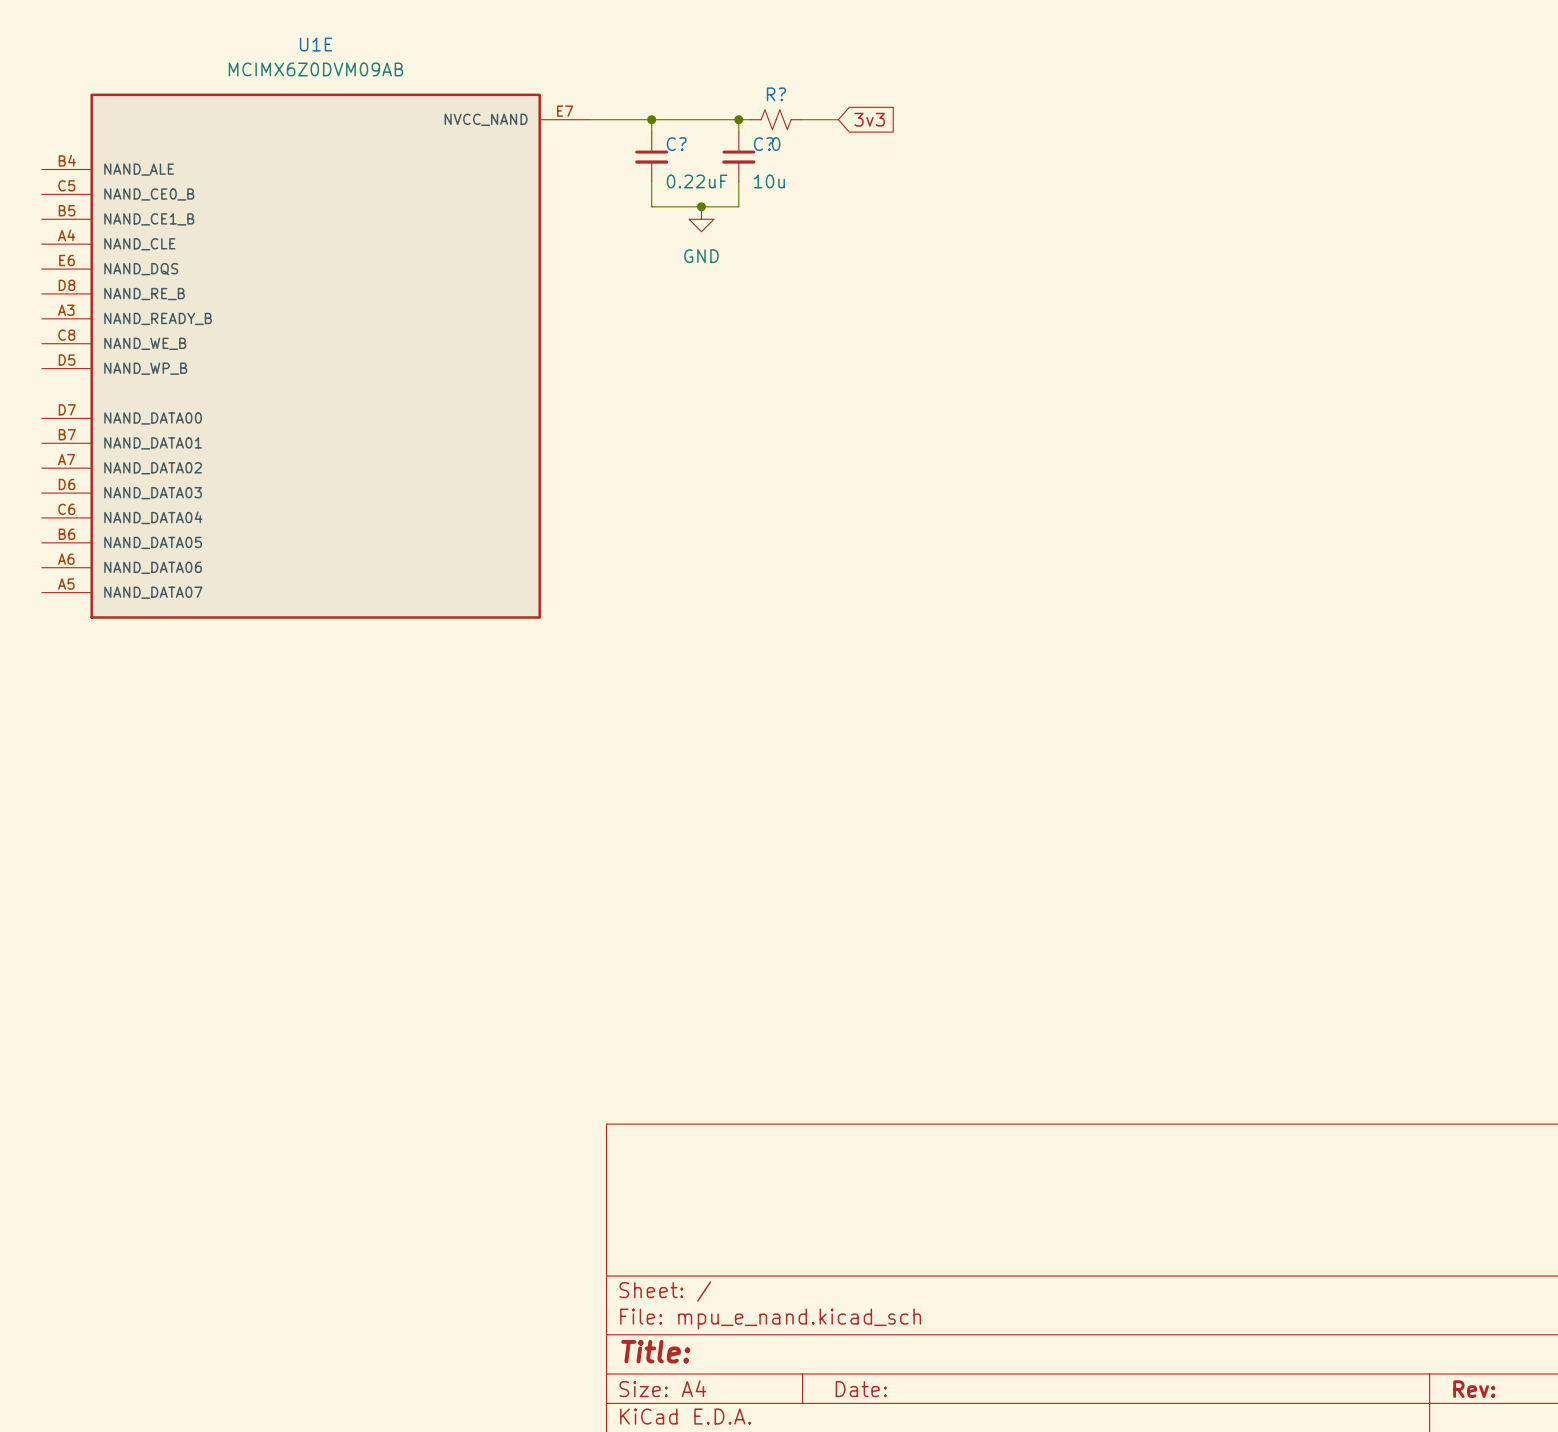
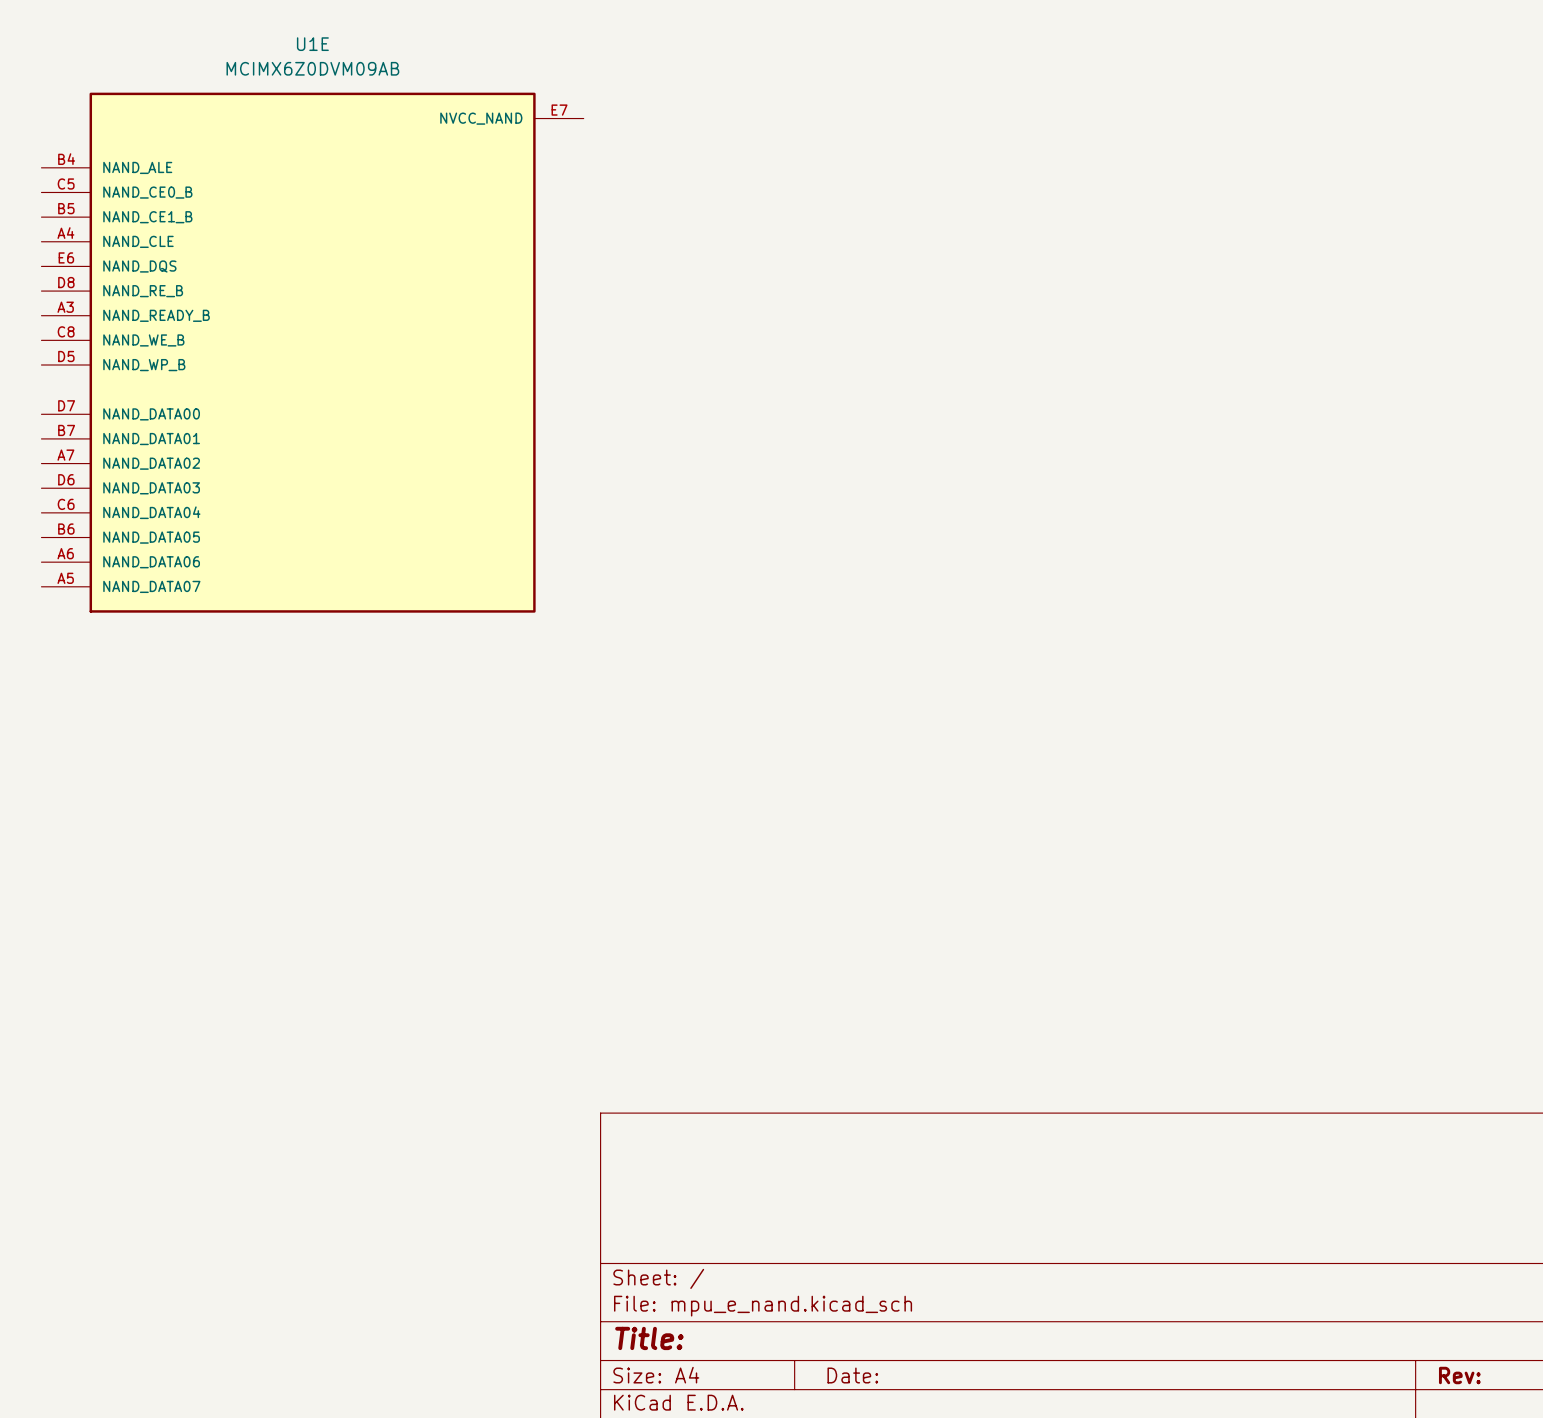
wire: (589, 119) (751, 119) -> none
wire: (651, 119) (651, 132) -> none
junction: (651, 119) -> none
wire: (738, 119) (738, 132) -> none
junction: (738, 119) -> none
R?: 0 (776, 119) -> none
wire: (801, 119) (838, 119) -> none
global label: 3v3 (869, 119) -> none
C?: 0.22uF (651, 157) -> none
C?: 10u (738, 157) -> none
wire: (651, 181) (651, 206) (738, 206) (738, 181) -> none
junction: (701, 206) -> none
power symbol: GND (701, 219) -> none

